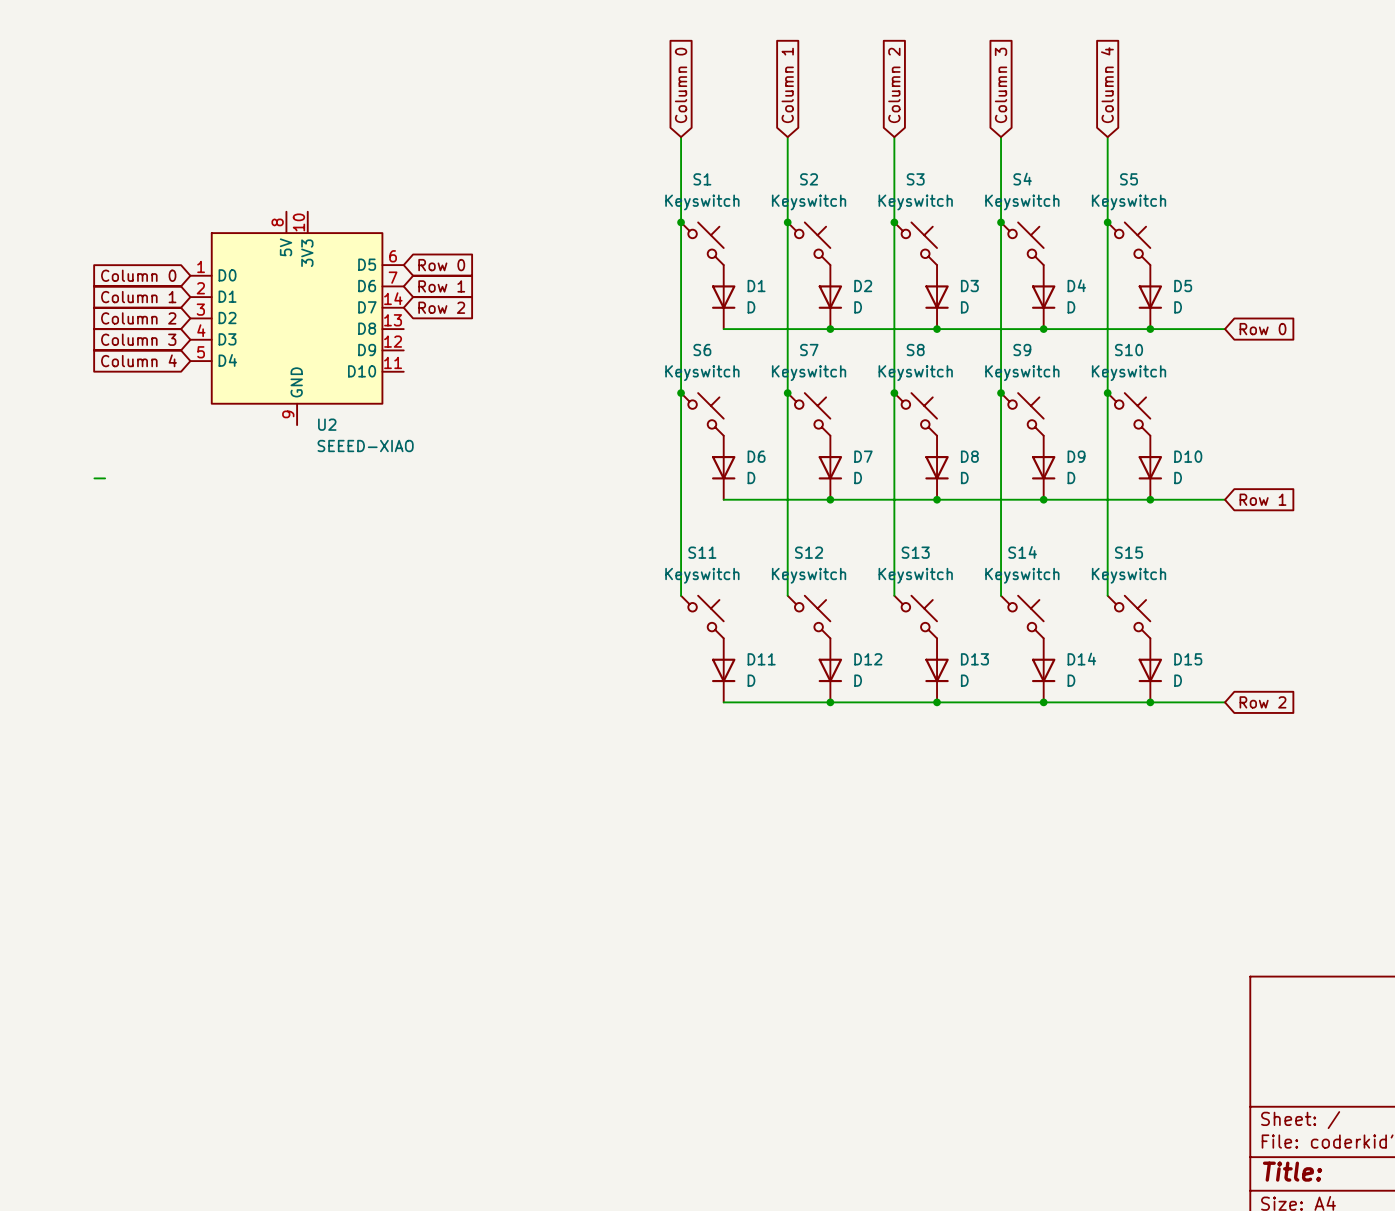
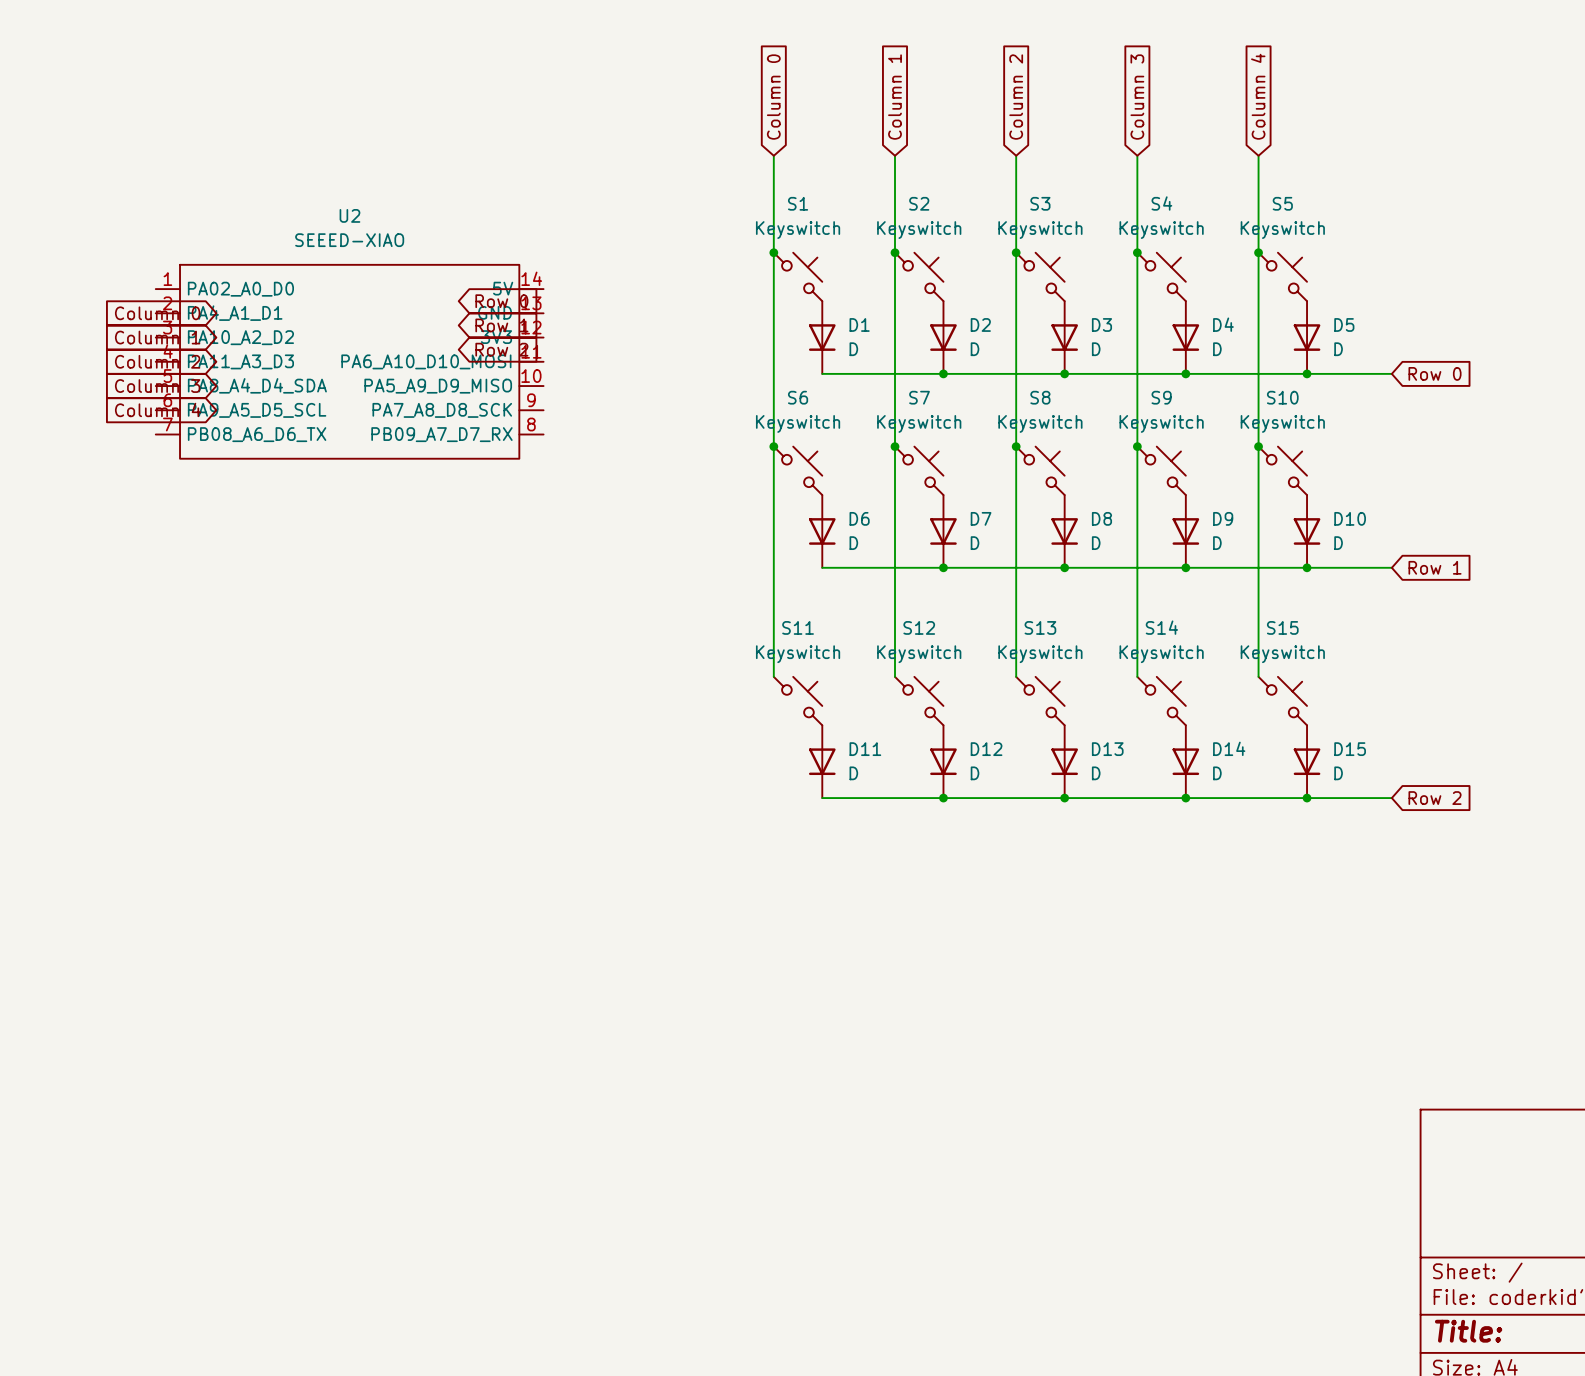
U2 symbol: [190, 211, 404, 426] -> [155, 264, 544, 459]
U2 name position: U2 (327, 424) -> U2 (349, 215)
U2 value position: SEEED-XIAO (365, 446) -> SEEED-XIAO (349, 240)
wire: (94, 478) (105, 478) -> none

